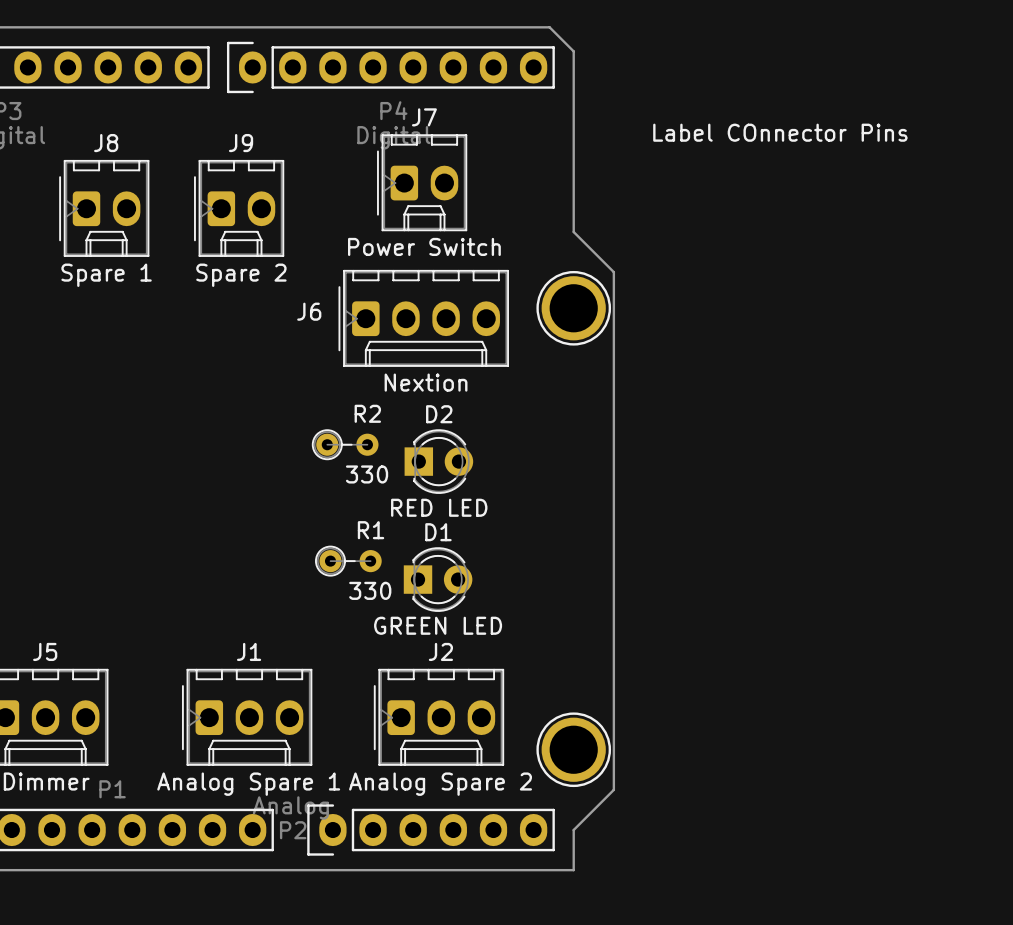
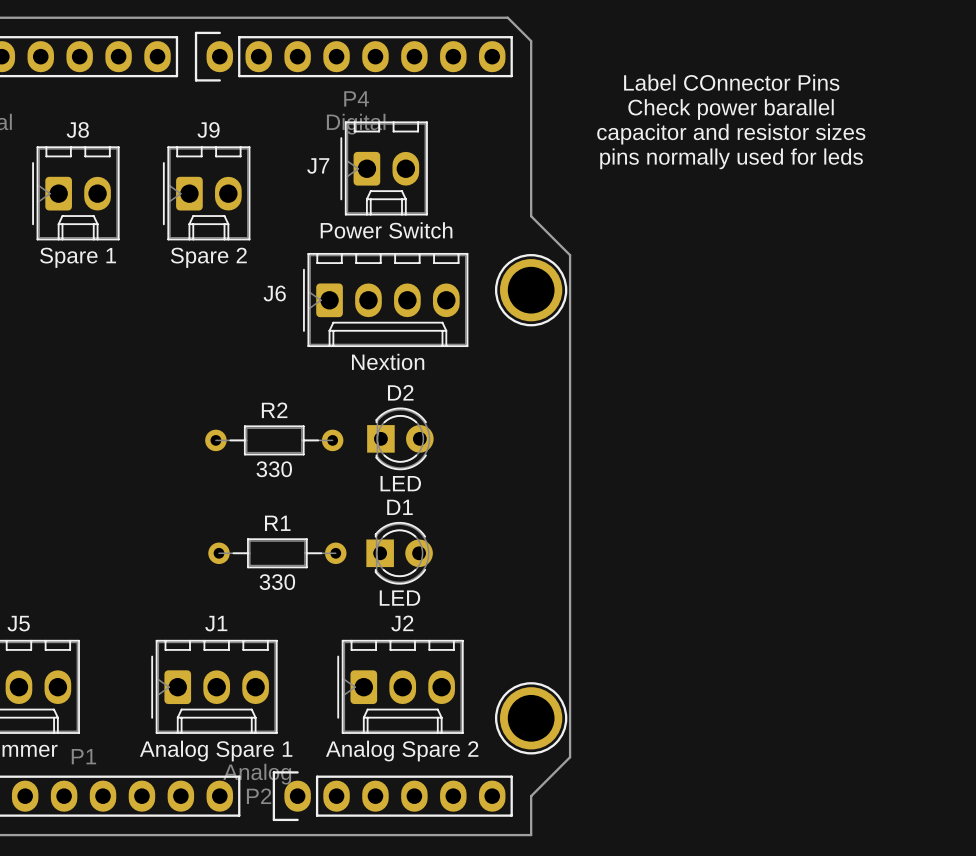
J7 name position: J7 (424, 117) -> J7 (318, 165)
text: none -> Check power barallel (731, 109)
text position: Label COnnector Pins (780, 132) -> Label COnnector Pins (731, 82)
text: none -> capacitor and resistor sizes (731, 134)
text: none -> pins normally used for leds (731, 158)
R2 footprint: [311, 429, 379, 461] -> [205, 425, 344, 456]
D2 value: RED LED (439, 507) -> LED (400, 483)
R1 footprint: [315, 545, 382, 577] -> [208, 538, 347, 569]
D1 value: GREEN LED (438, 625) -> LED (399, 598)

